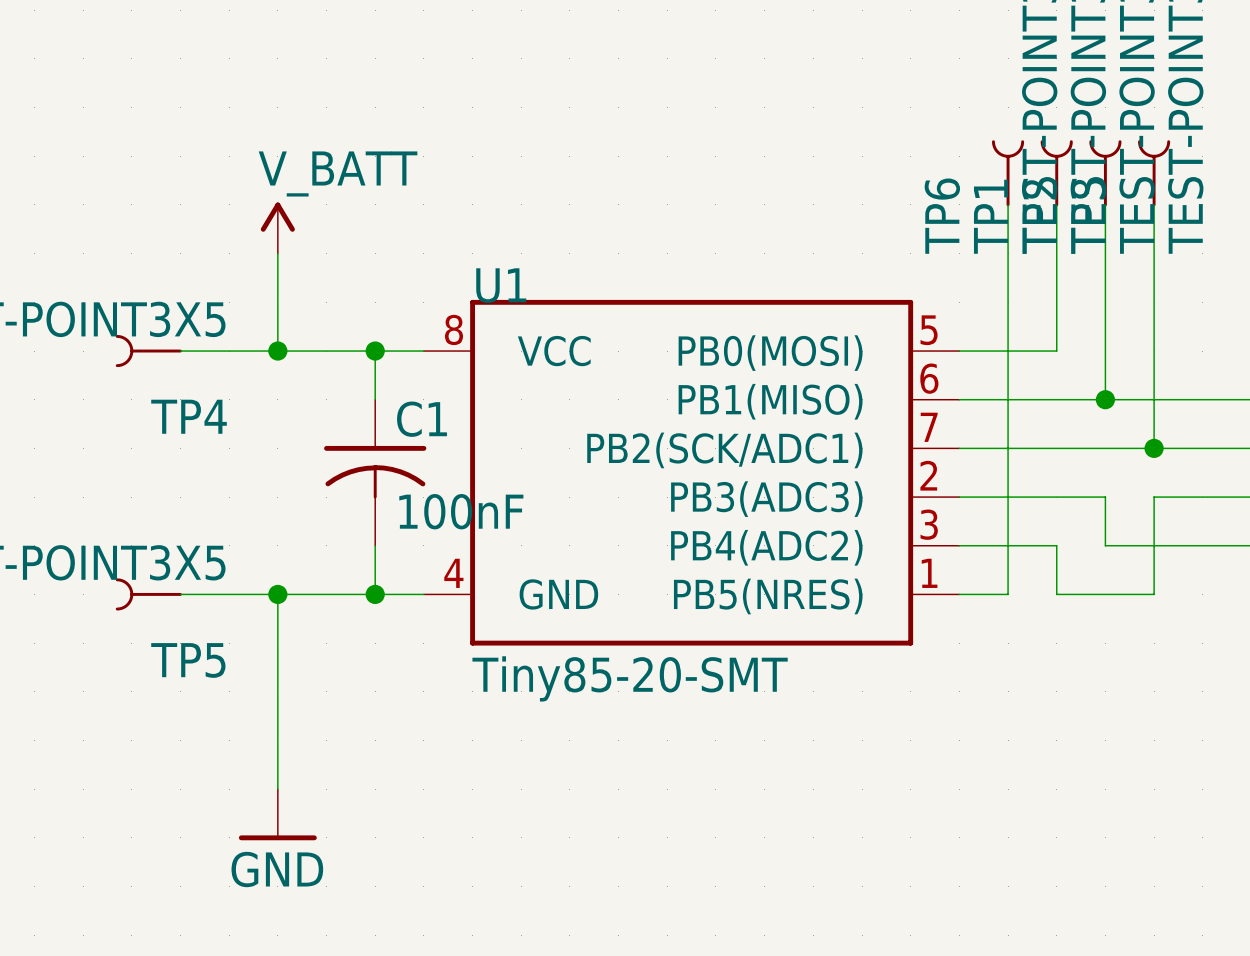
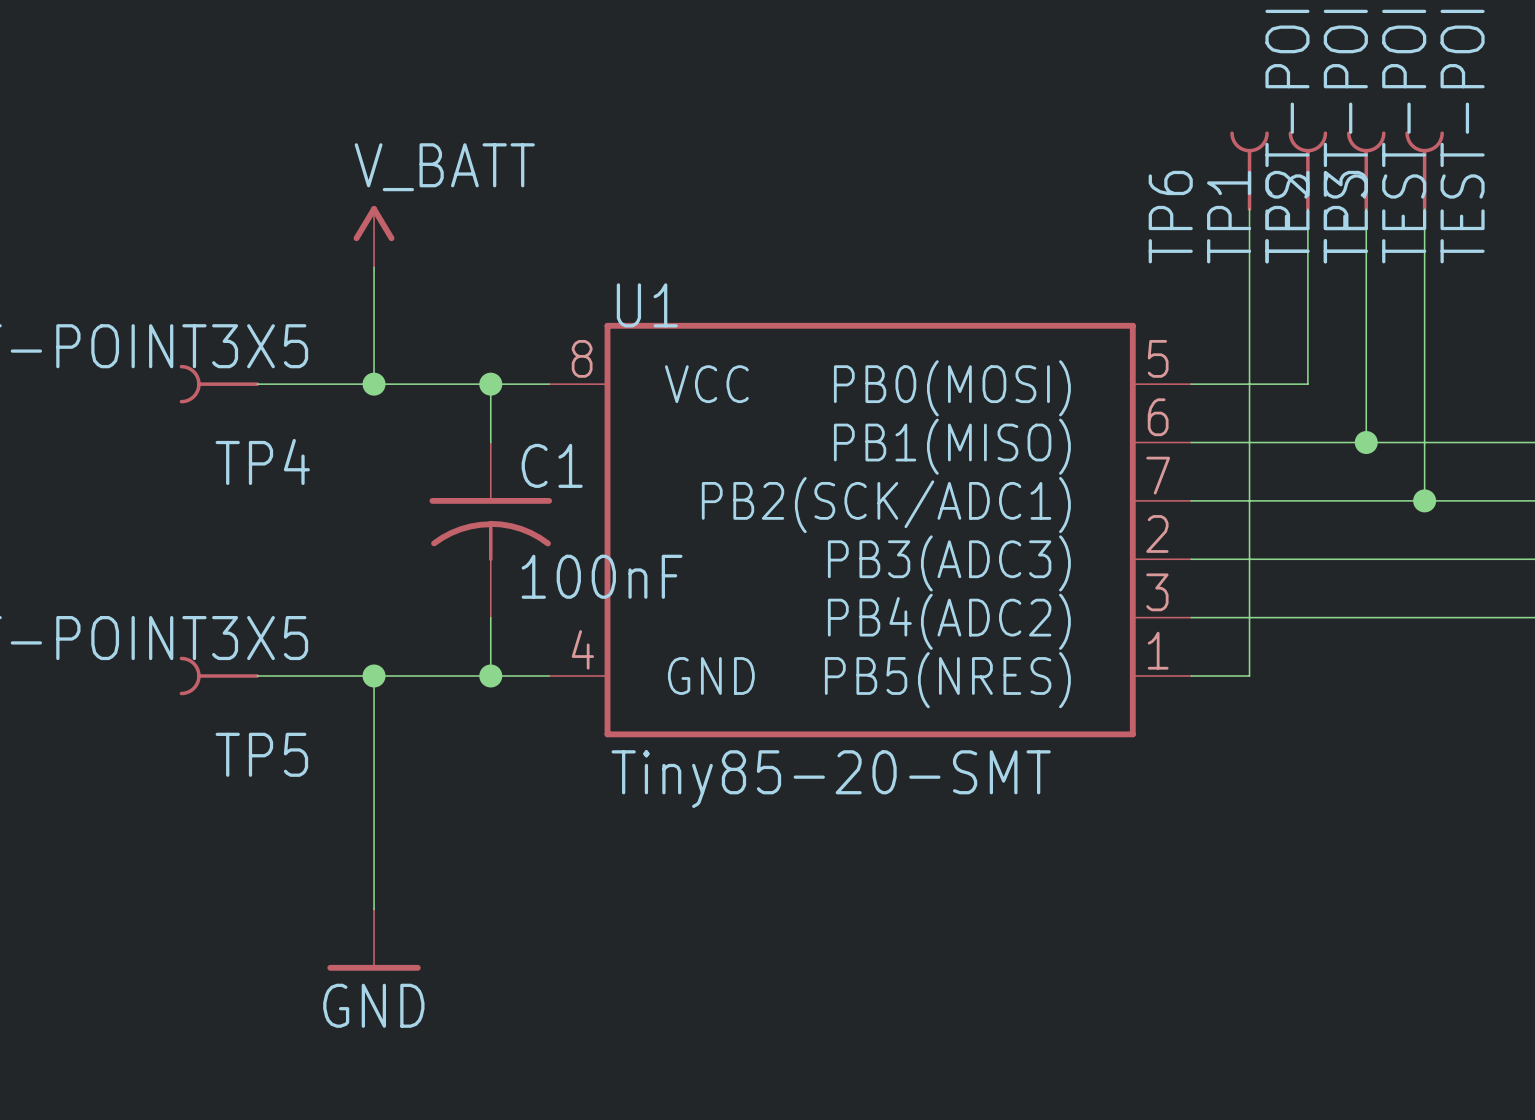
wire: (1105, 497) (1105, 545) -> (1307, 617) (1366, 617)
wire: (1154, 497) (1154, 594) (1056, 594) (1056, 545) -> (1424, 559) (1366, 559)

